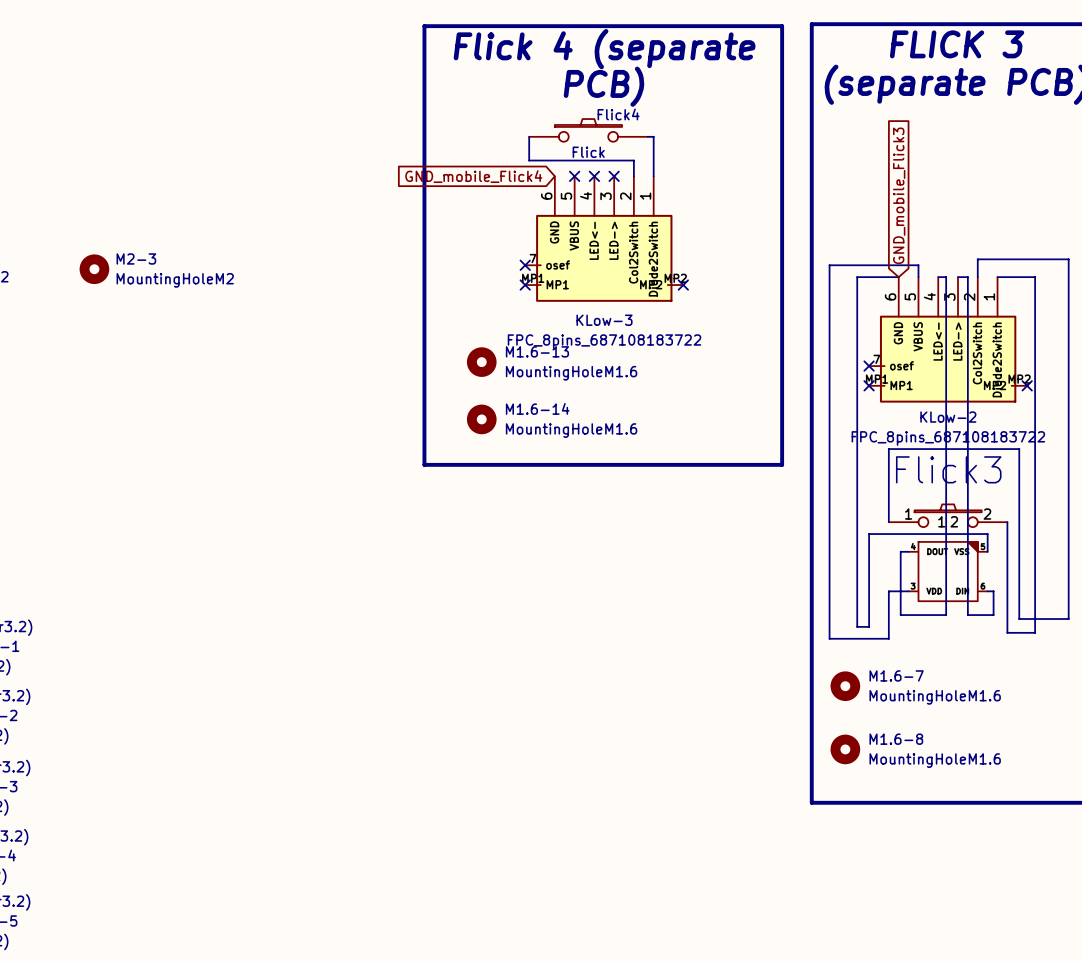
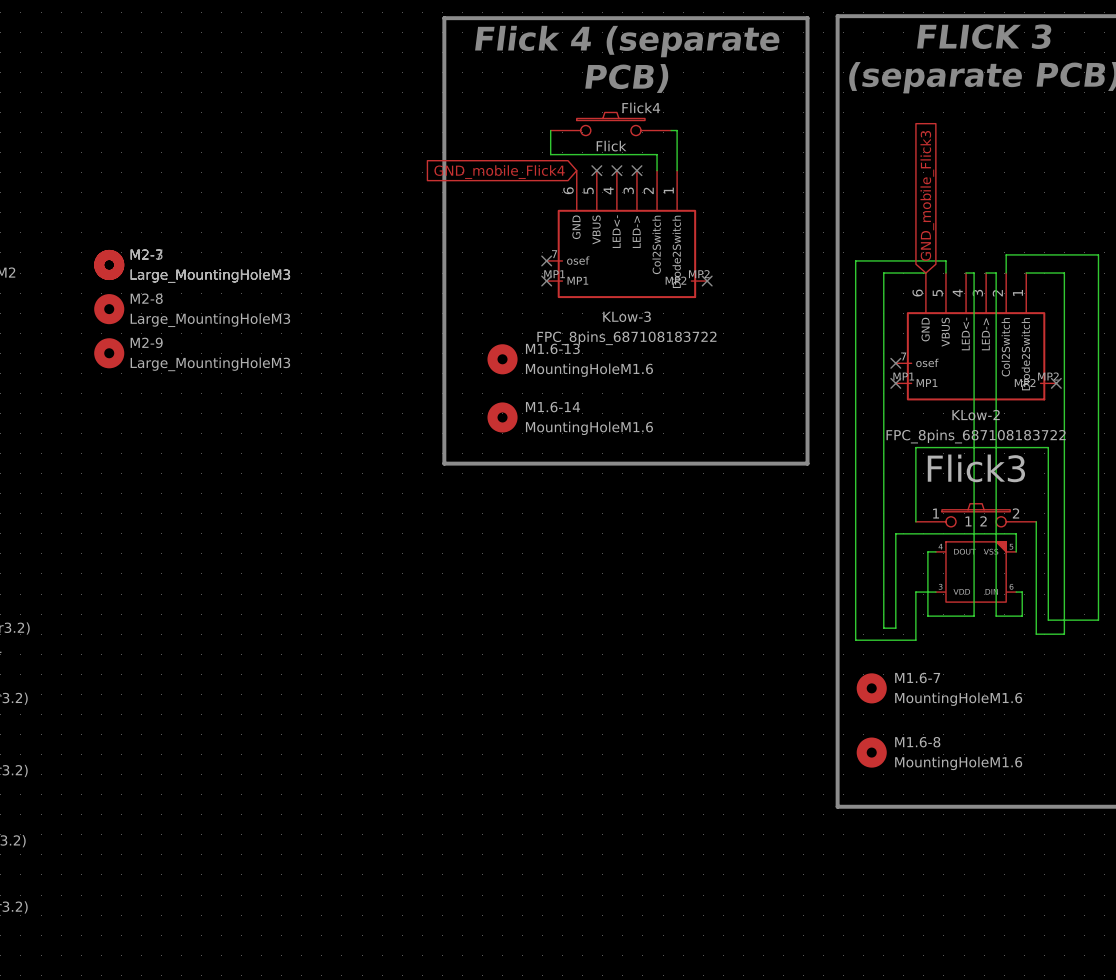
part: none -> Large_MountingHoleM3 (109, 264)
M2-3 value: MountingHoleM2 (175, 280) -> Large_MountingHoleM3 (210, 276)
M2-8: none -> Large_MountingHoleM3 (109, 309)
M2-9: none -> Large_MountingHoleM3 (109, 353)

